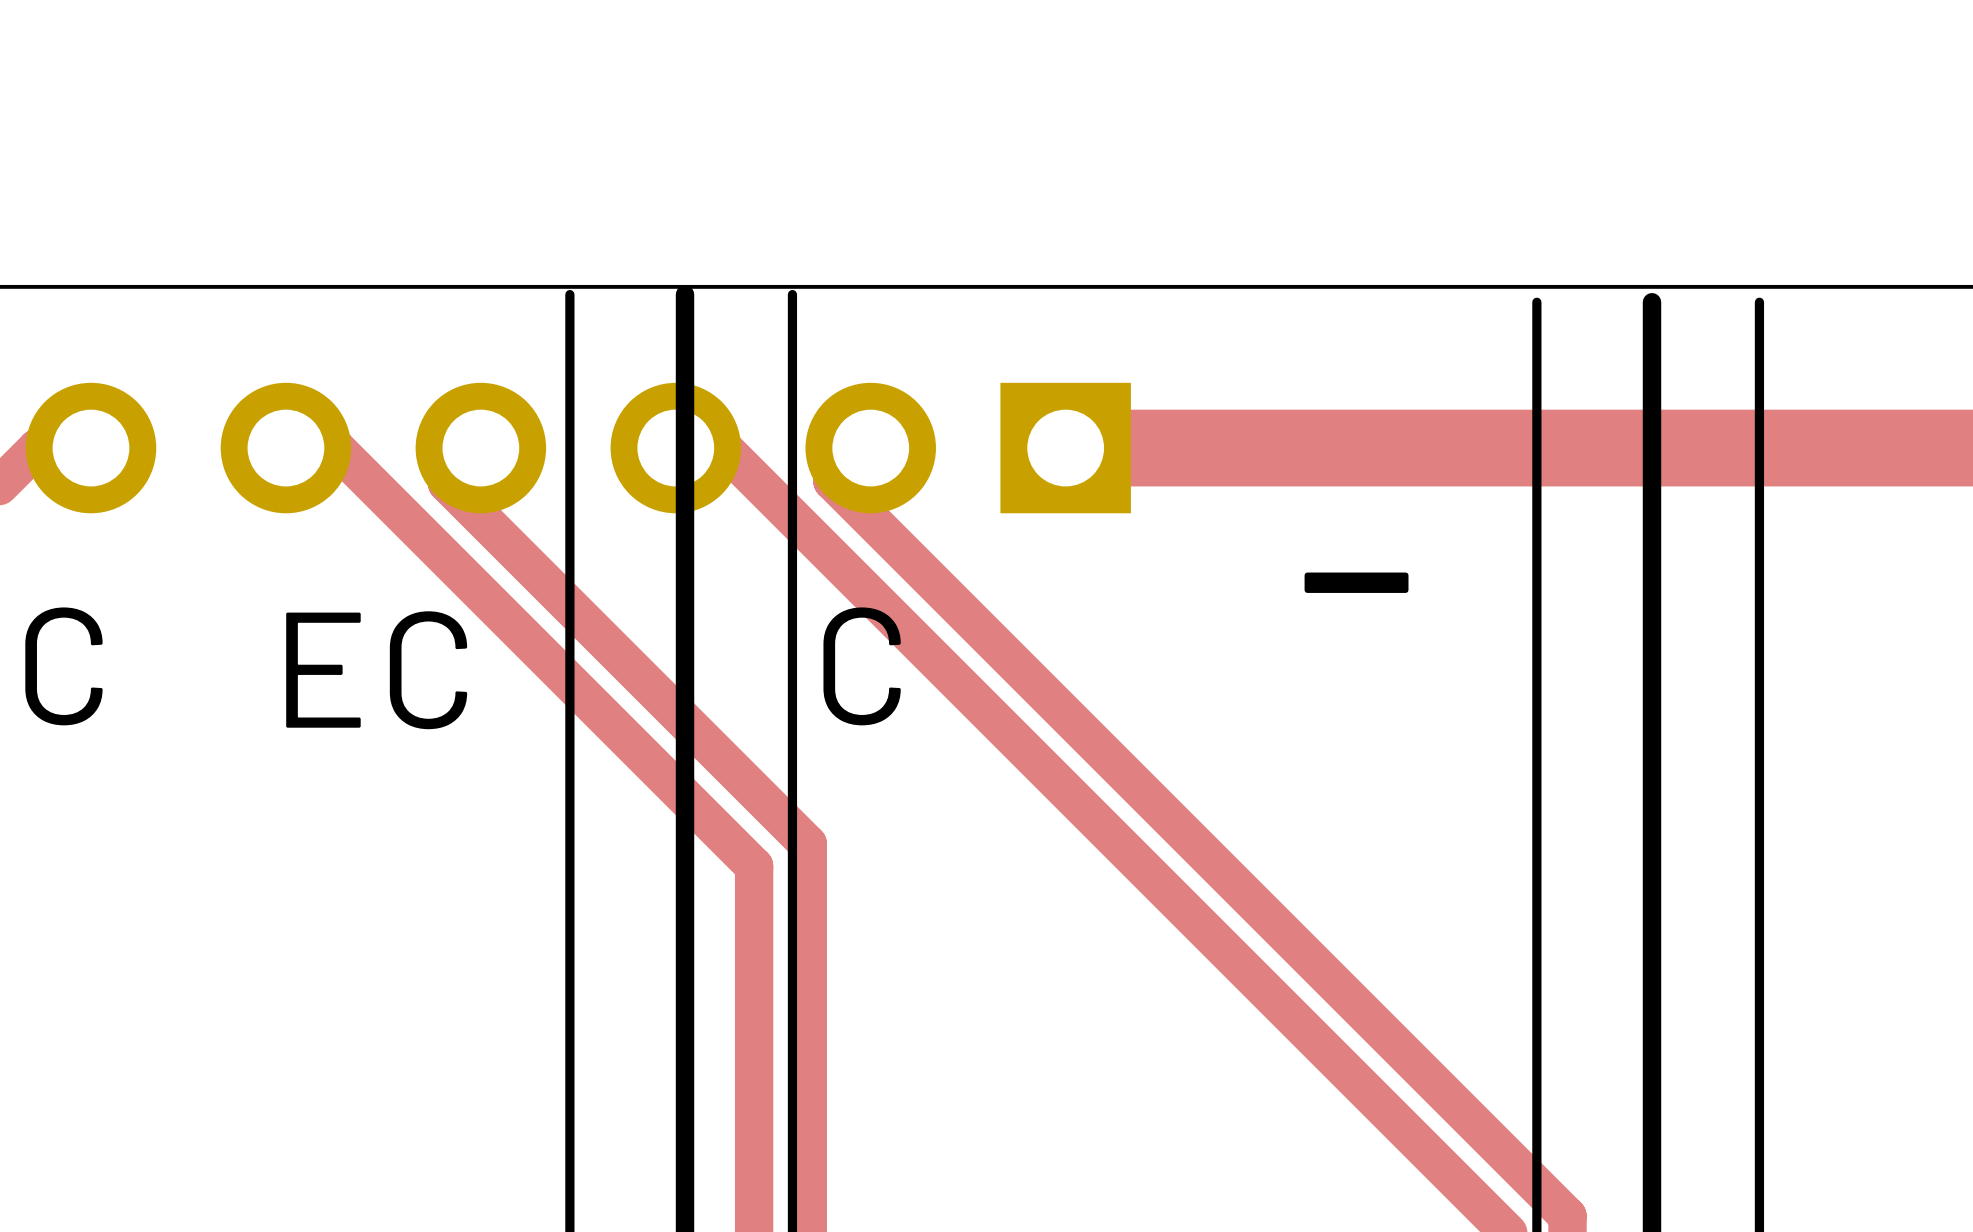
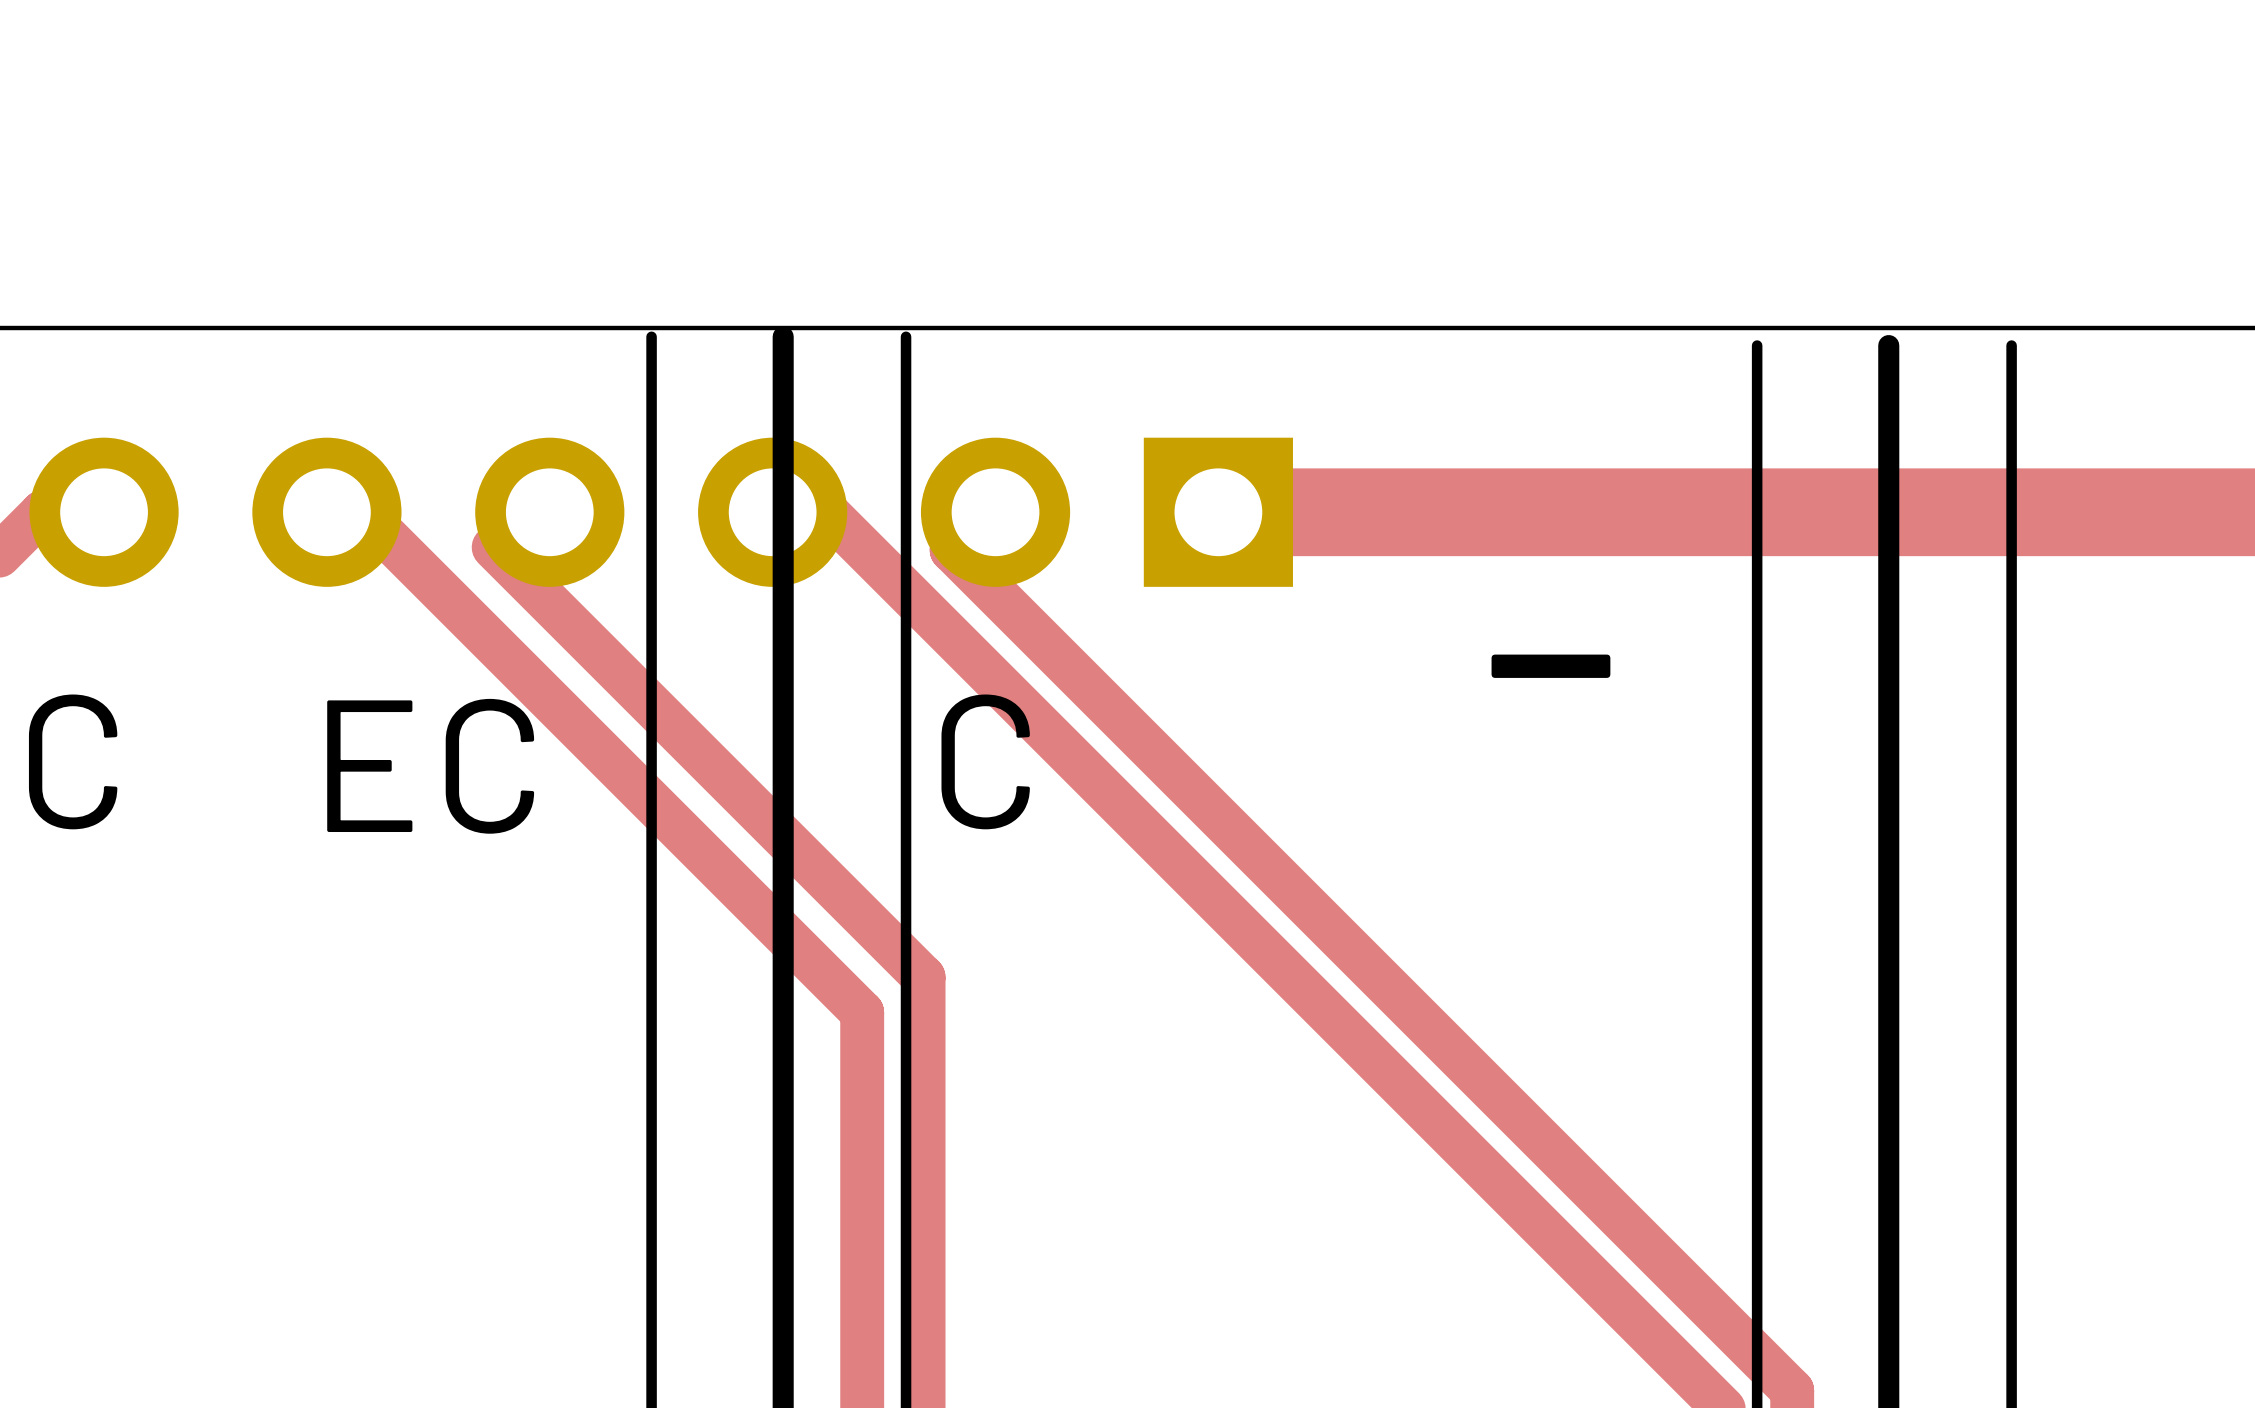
top track: (316, 448) (335, 448) (754, 866) (754, 885) -> (362, 512) (862, 1012)
top track: (447, 478) (447, 483) (807, 844) (807, 854) -> (493, 547) (923, 977)

